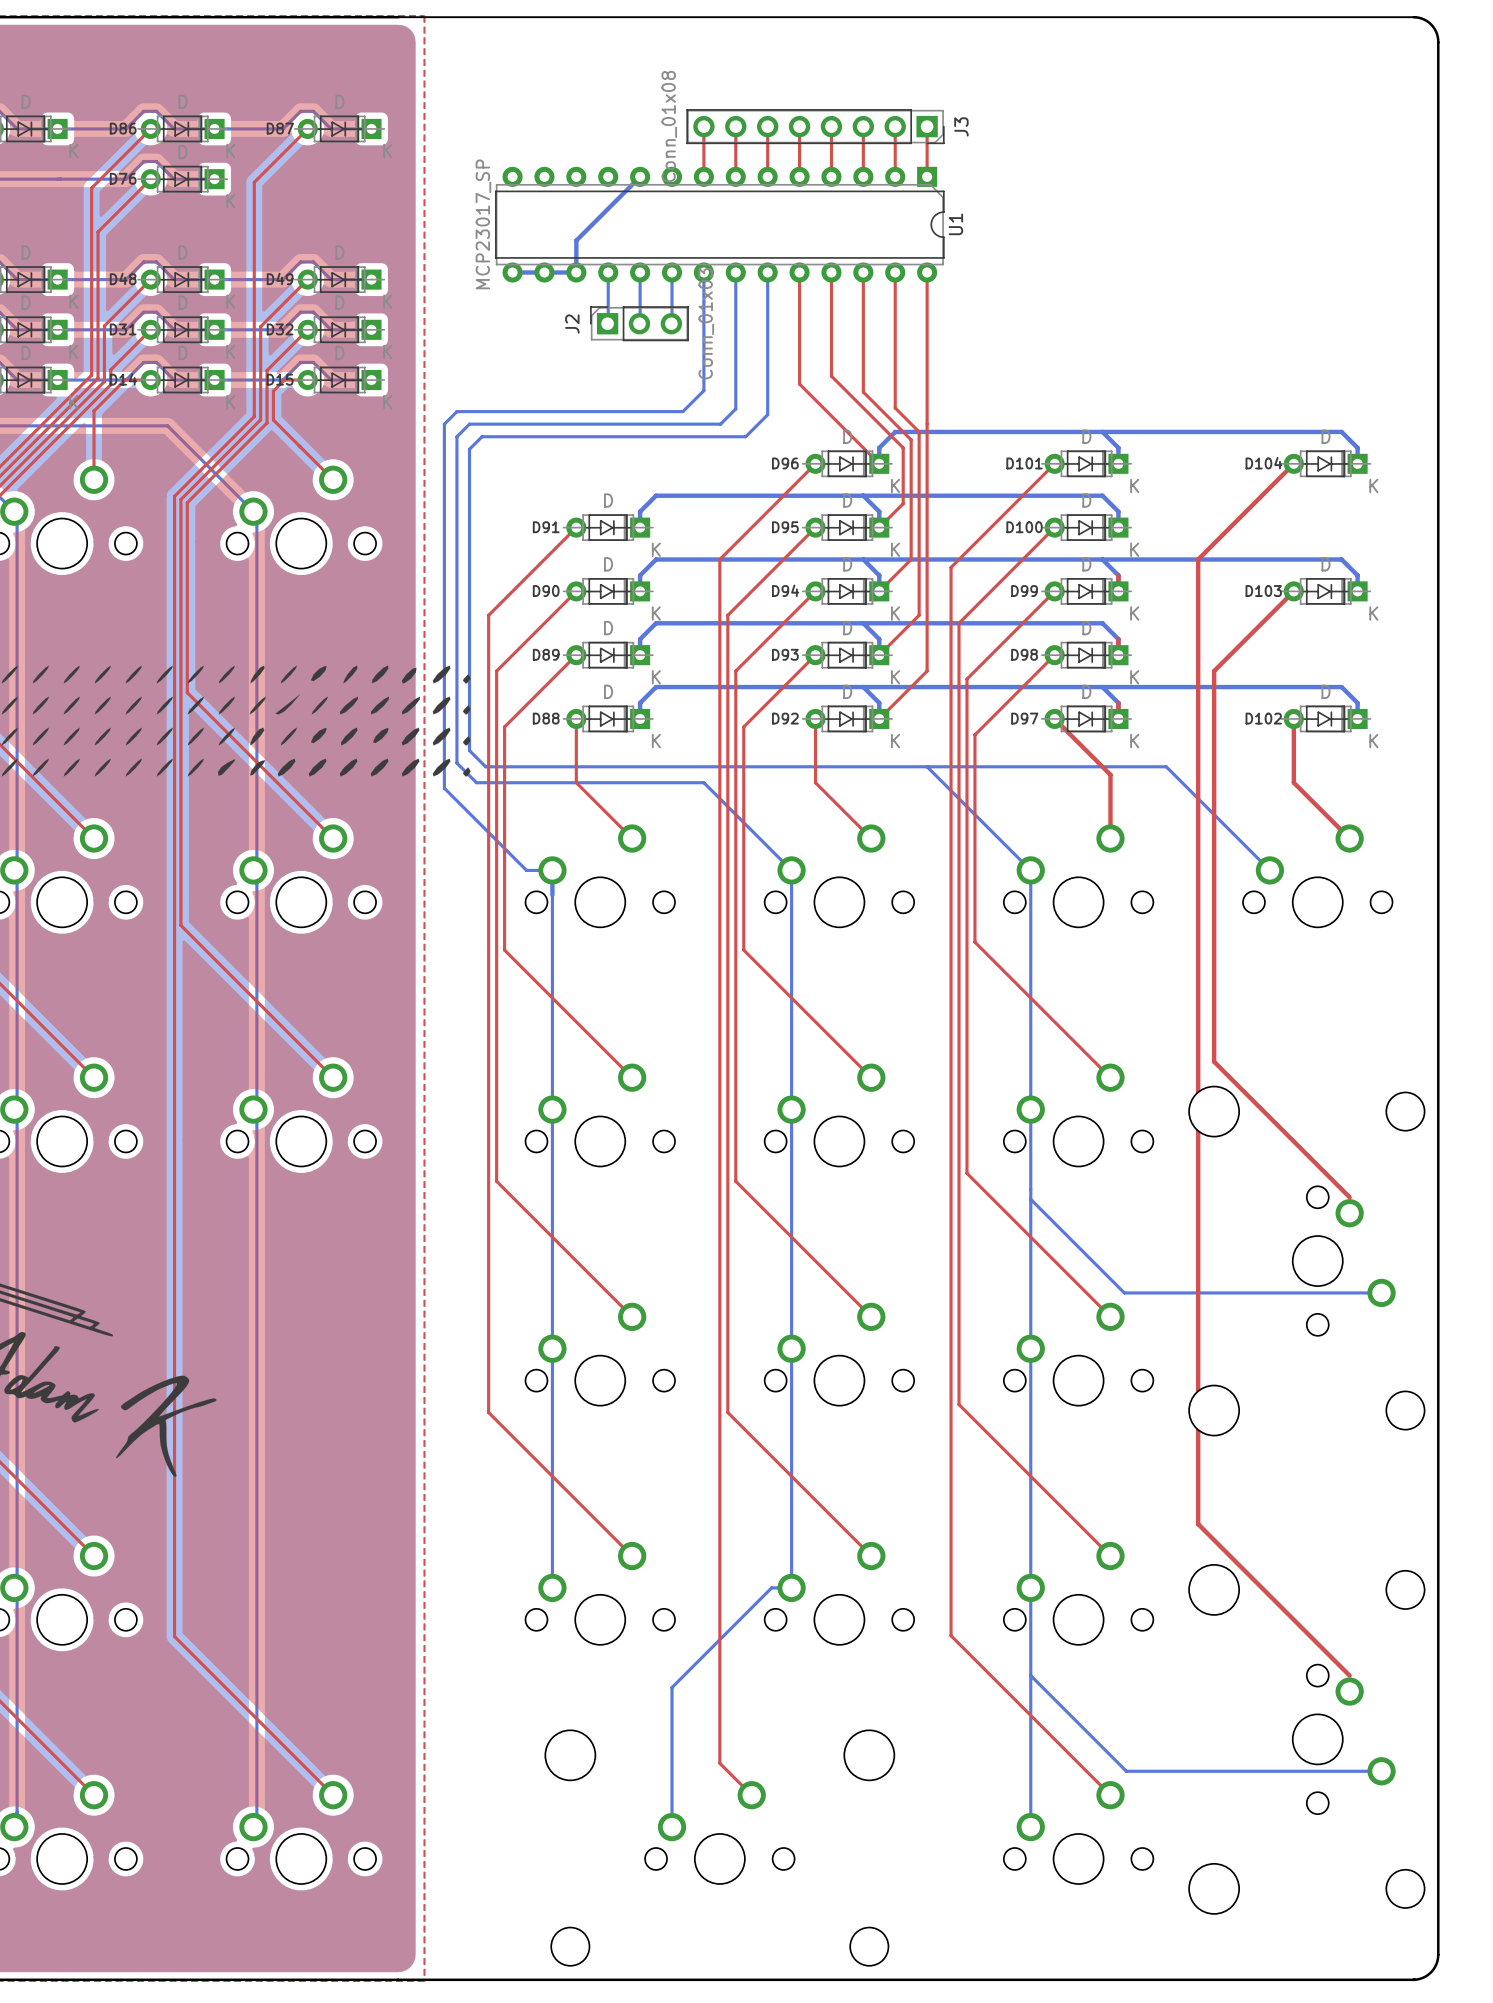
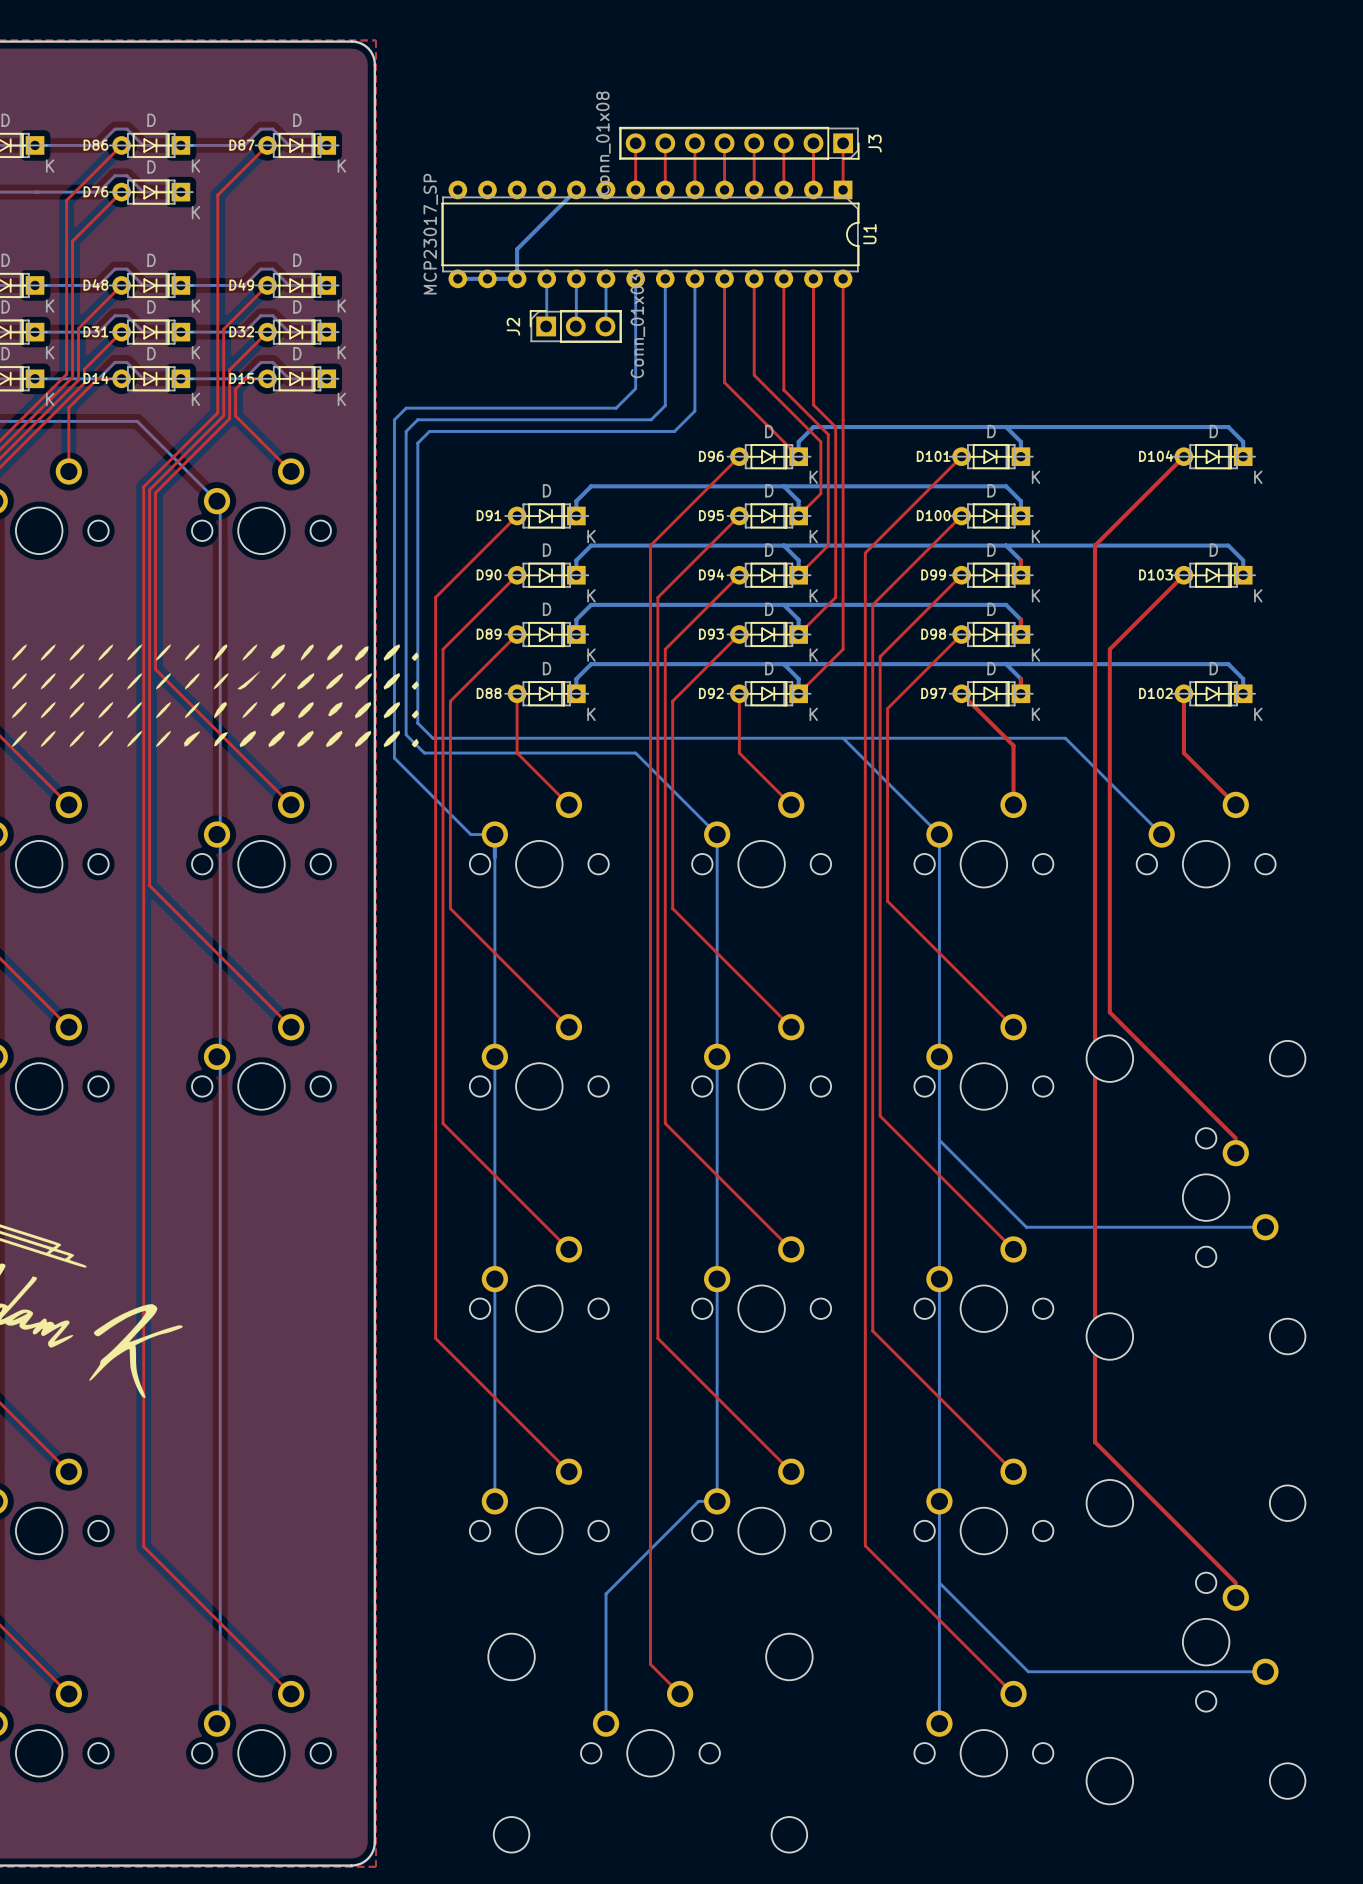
board edge: (398, 17) (1415, 17) -> none
board edge: (1413, 17) (1421, 18) (1431, 24) (1437, 34) (1438, 42) (1438, 1954) (1436, 1964) (1430, 1972) (1422, 1977) (1413, 1979) -> none
board edge: (398, 1979) (1415, 1979) -> (351, 1865) (360, 1863) (367, 1858) (373, 1851) (374, 1842) (374, 65) (373, 57) (368, 48) (362, 43) (351, 41)

